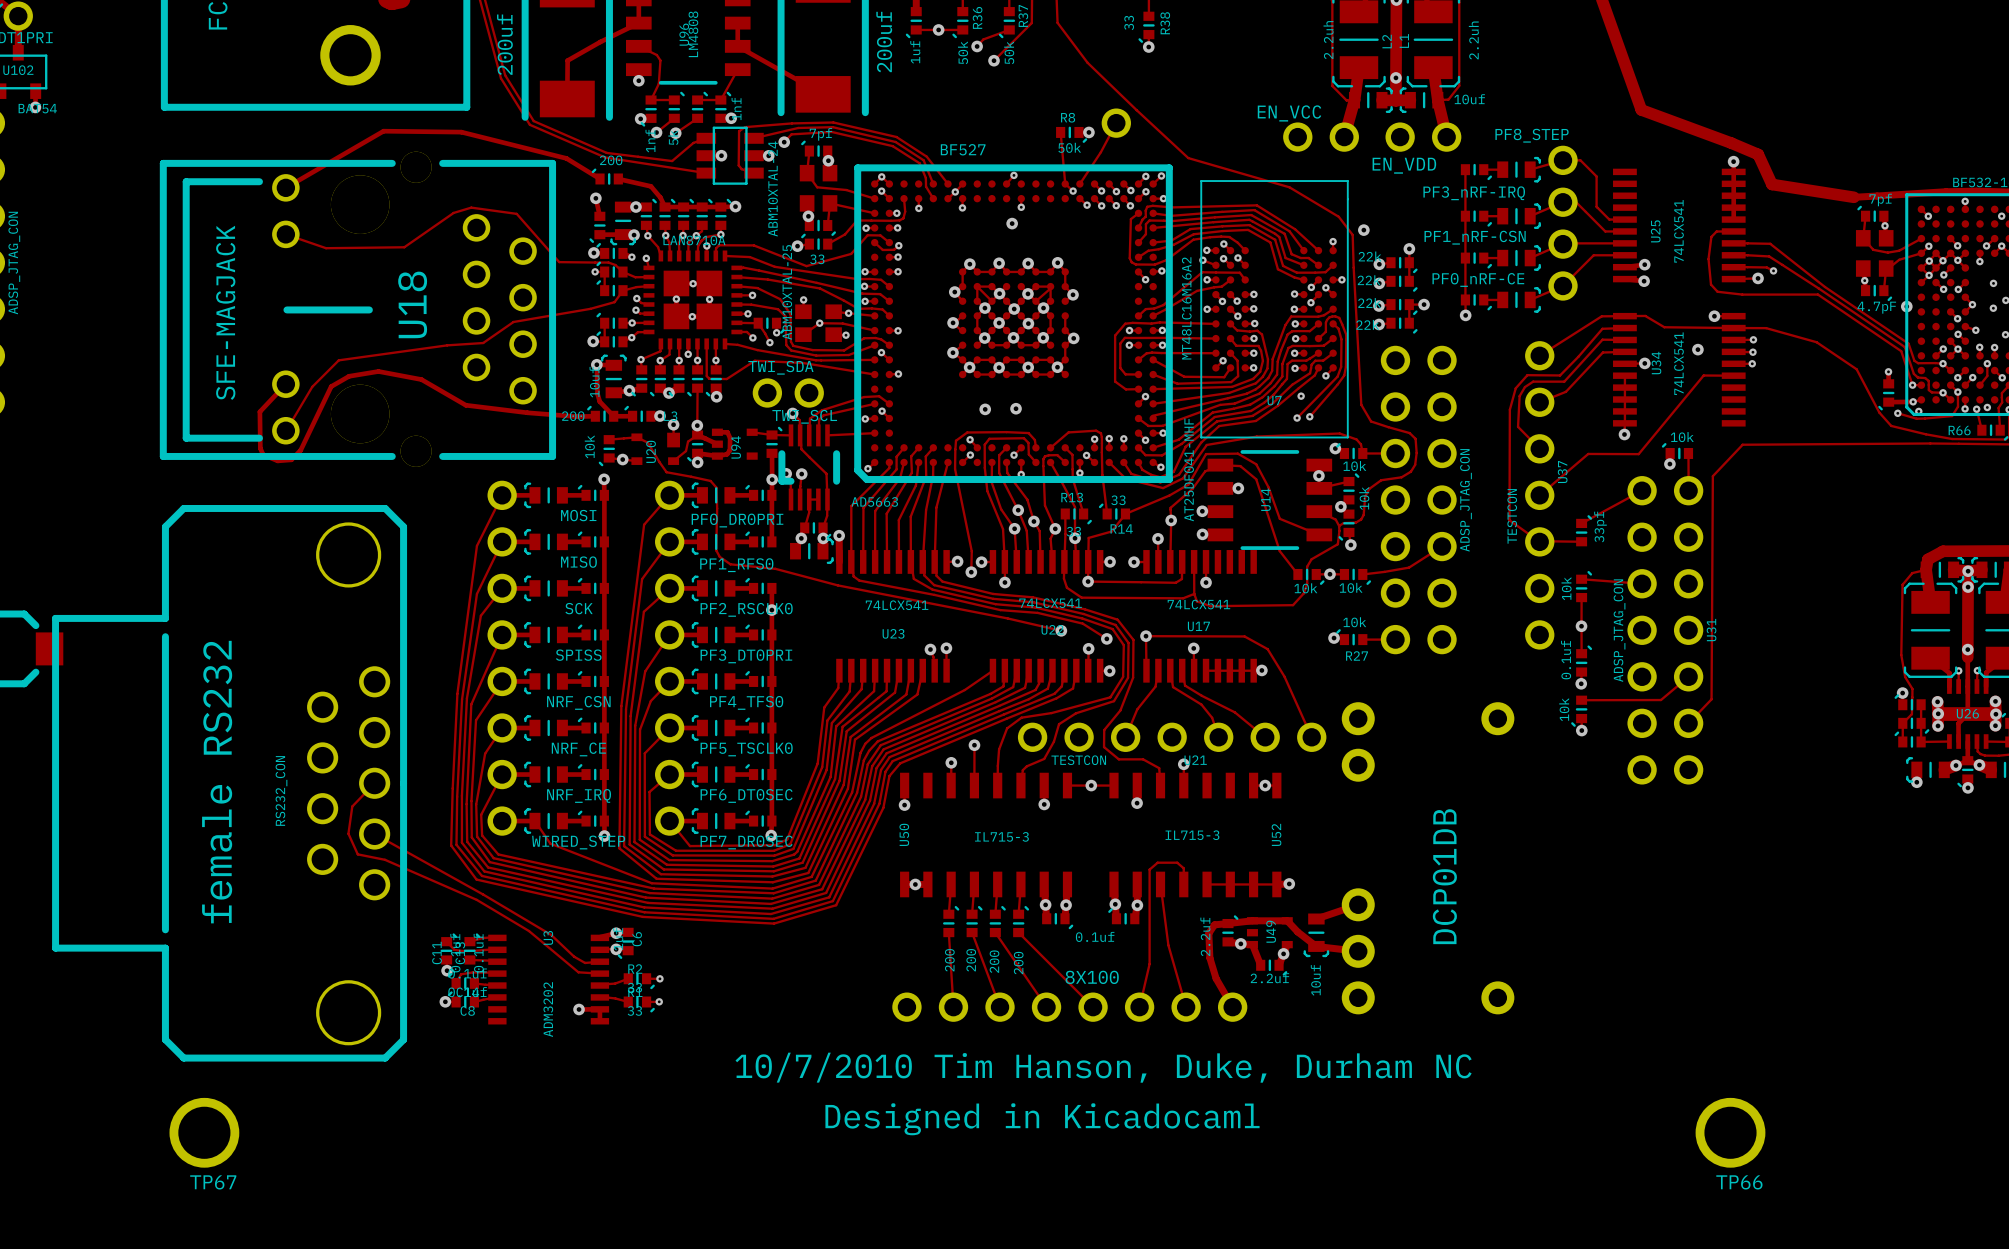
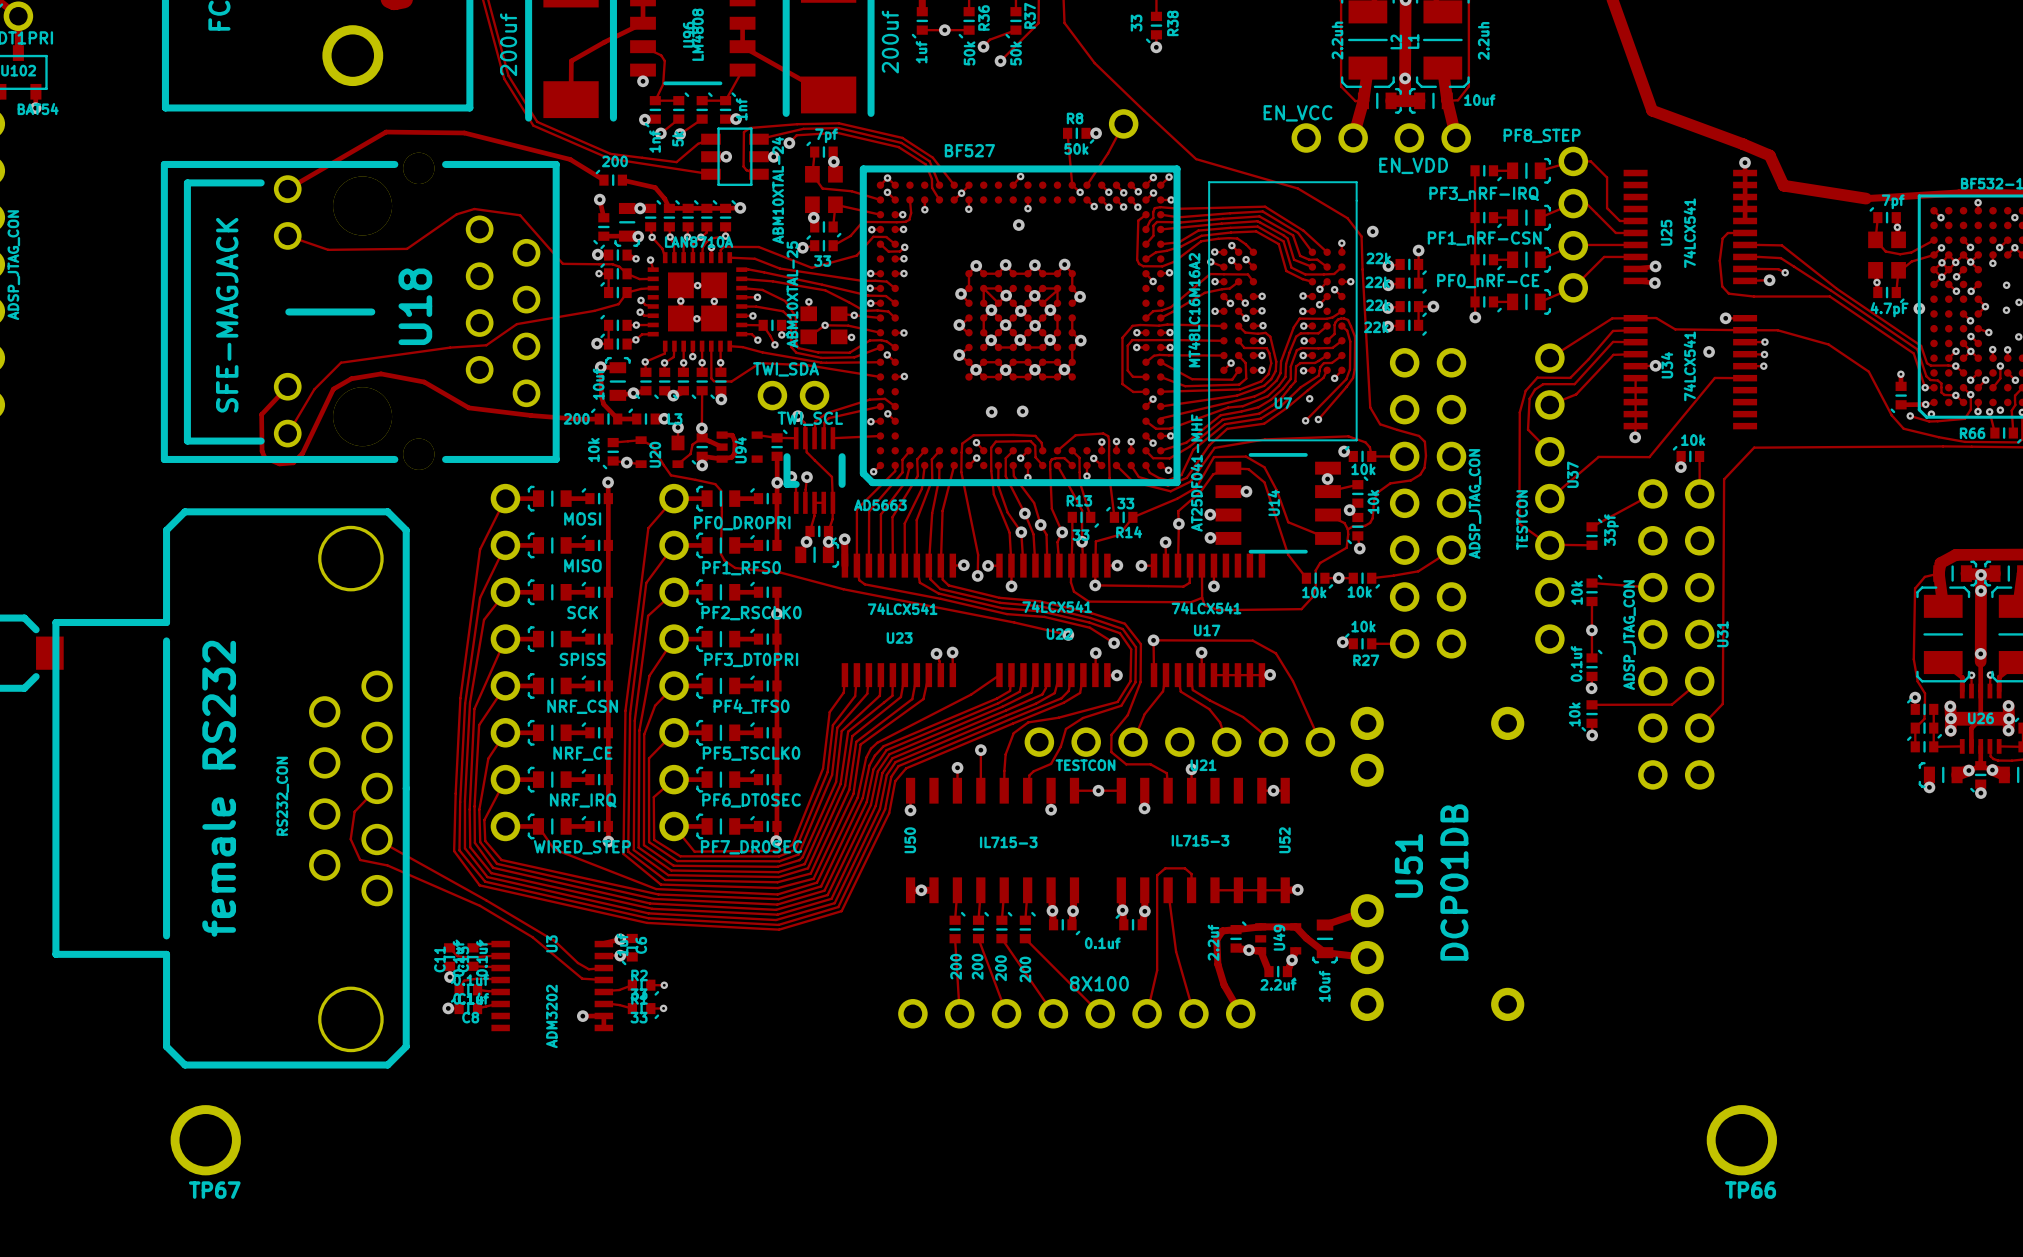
10/7/2010 Tim Hanson, Duke, Durham NC name: 10/7/2010 Tim Hanson, Duke, Durham NC (1103, 1067) -> none
Designed in Kicadocaml name: Designed in Kicadocaml (1042, 1119) -> U51 (1408, 865)

